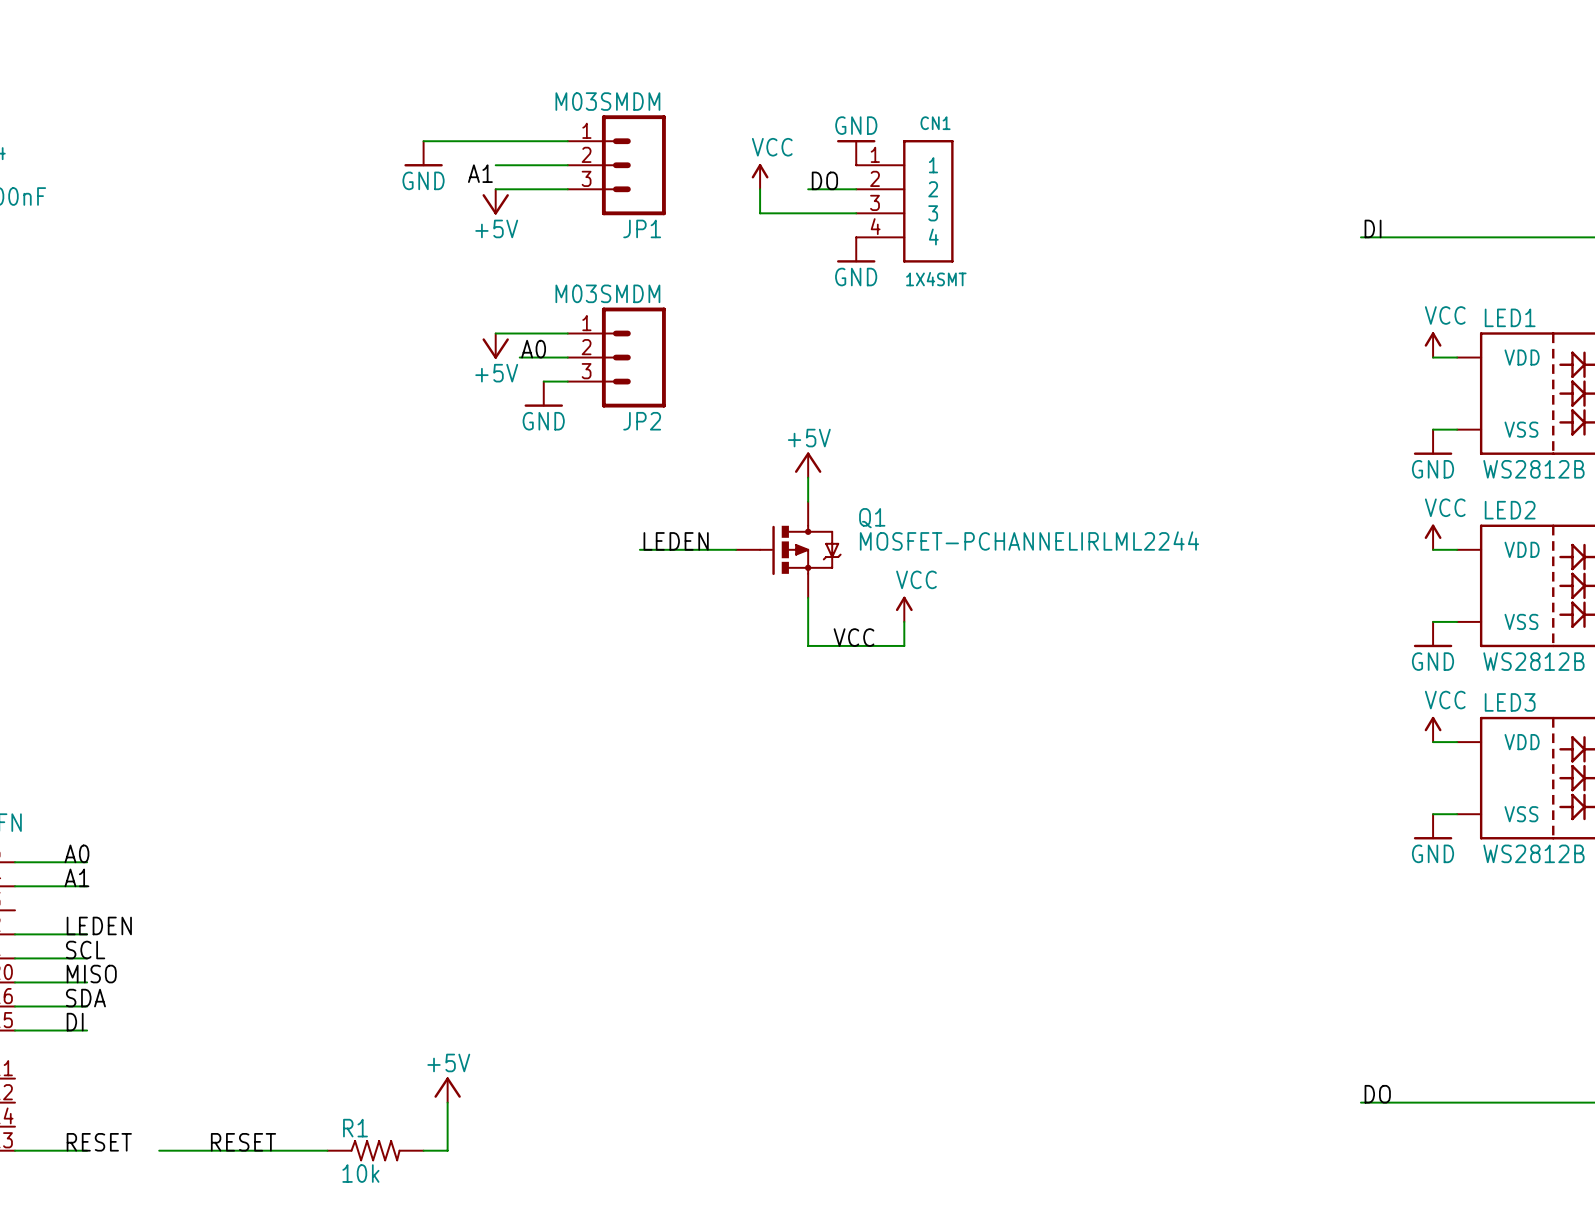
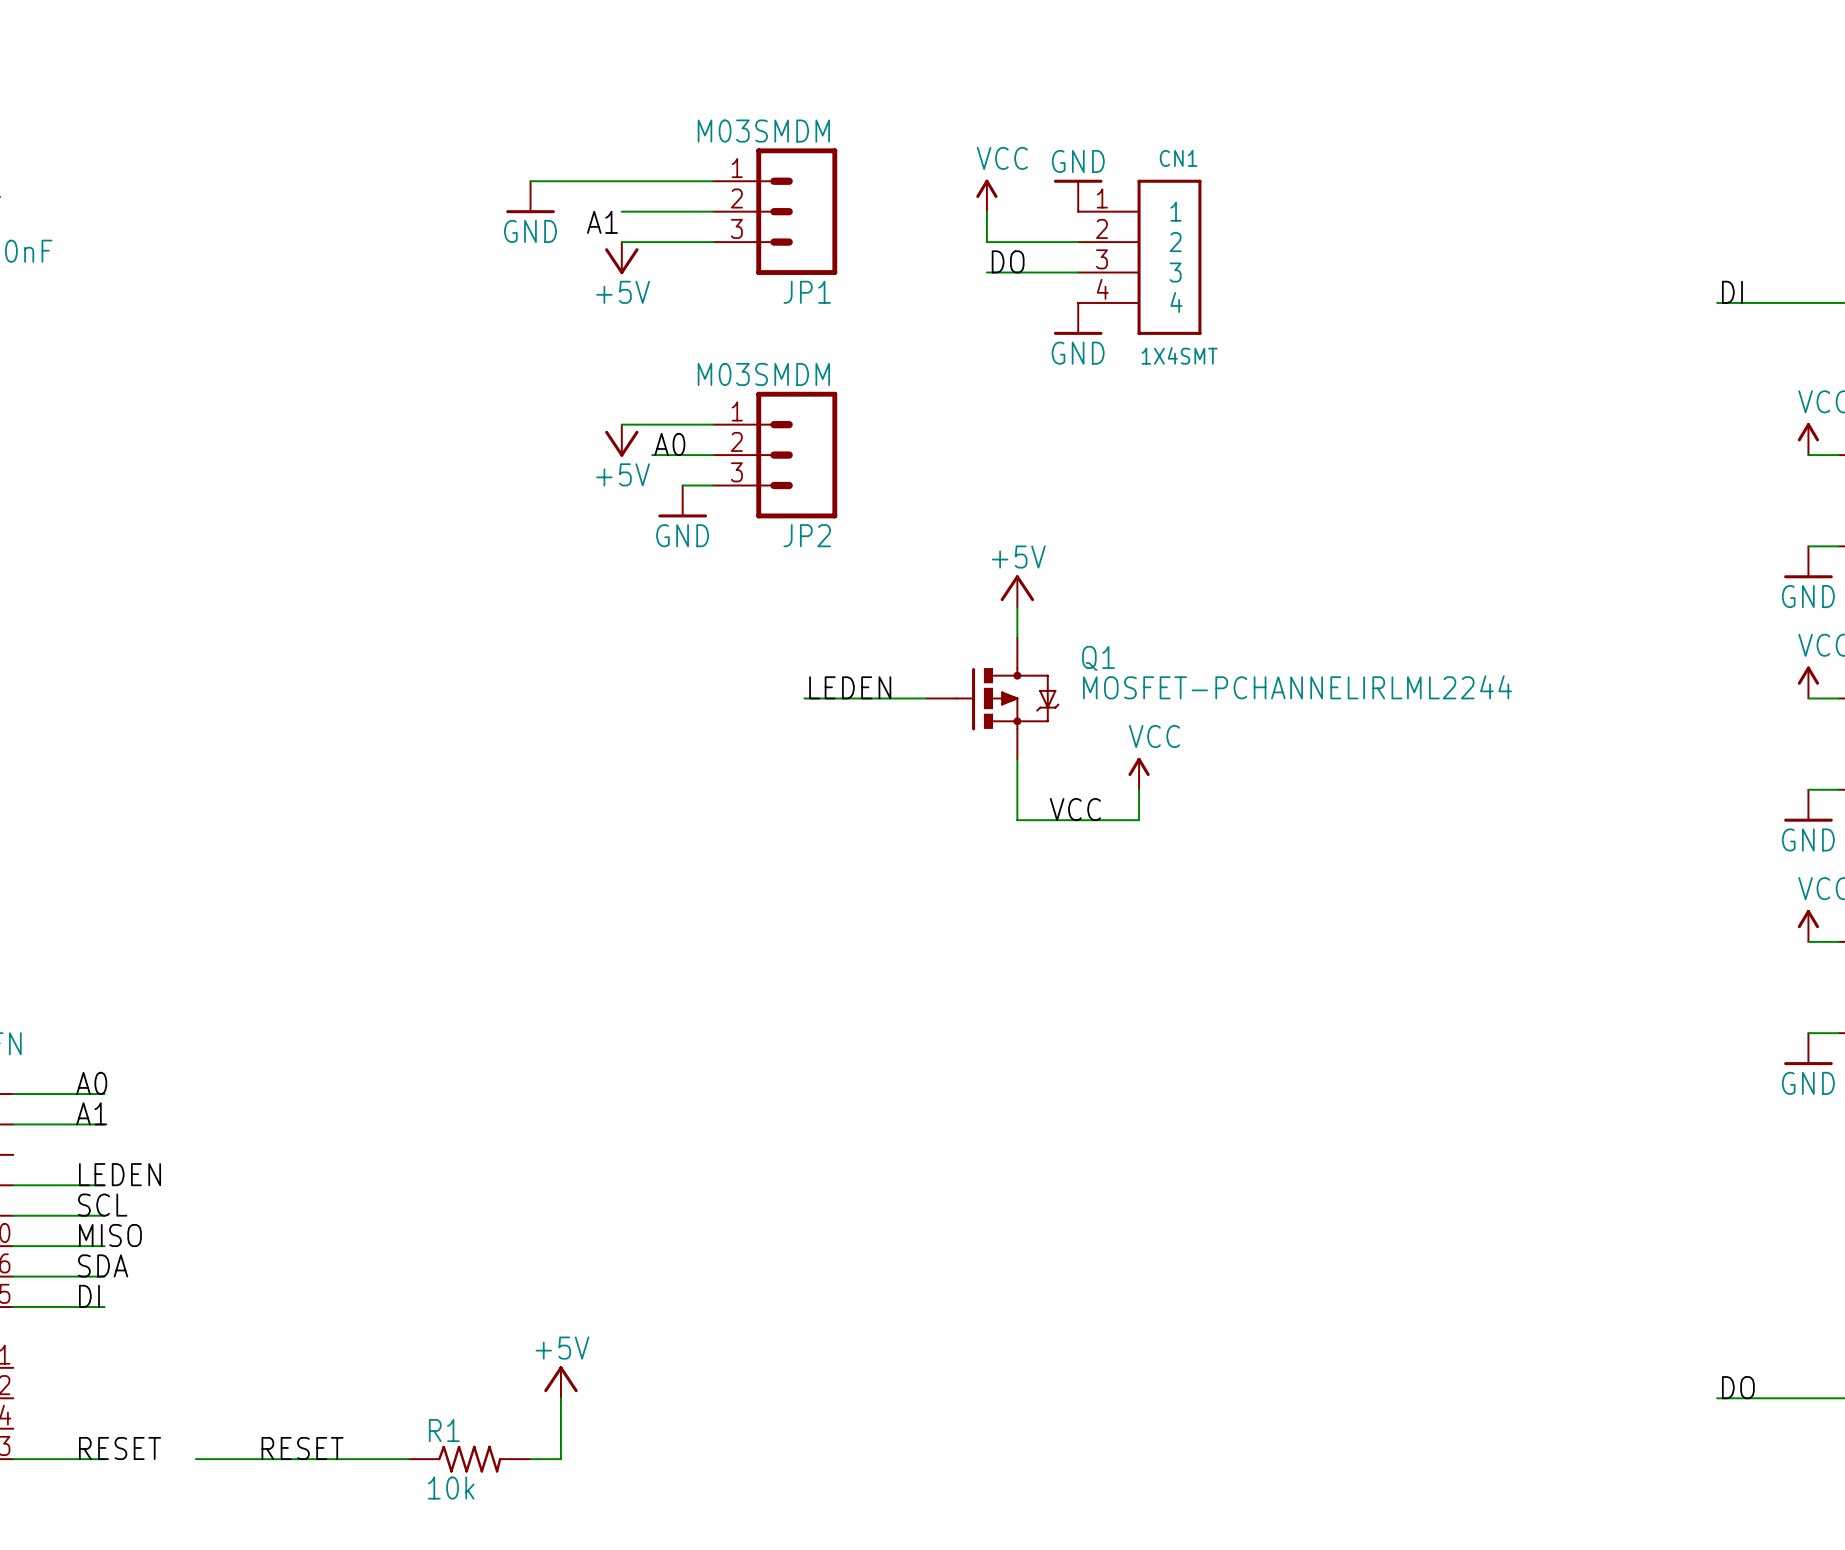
power symbol position: VCC (760, 176) -> VCC (986, 195)
label position: DO (824, 180) -> DO (1008, 261)
wire: (760, 189) (760, 213) (784, 213) -> (986, 211) (986, 242) (1017, 242)

